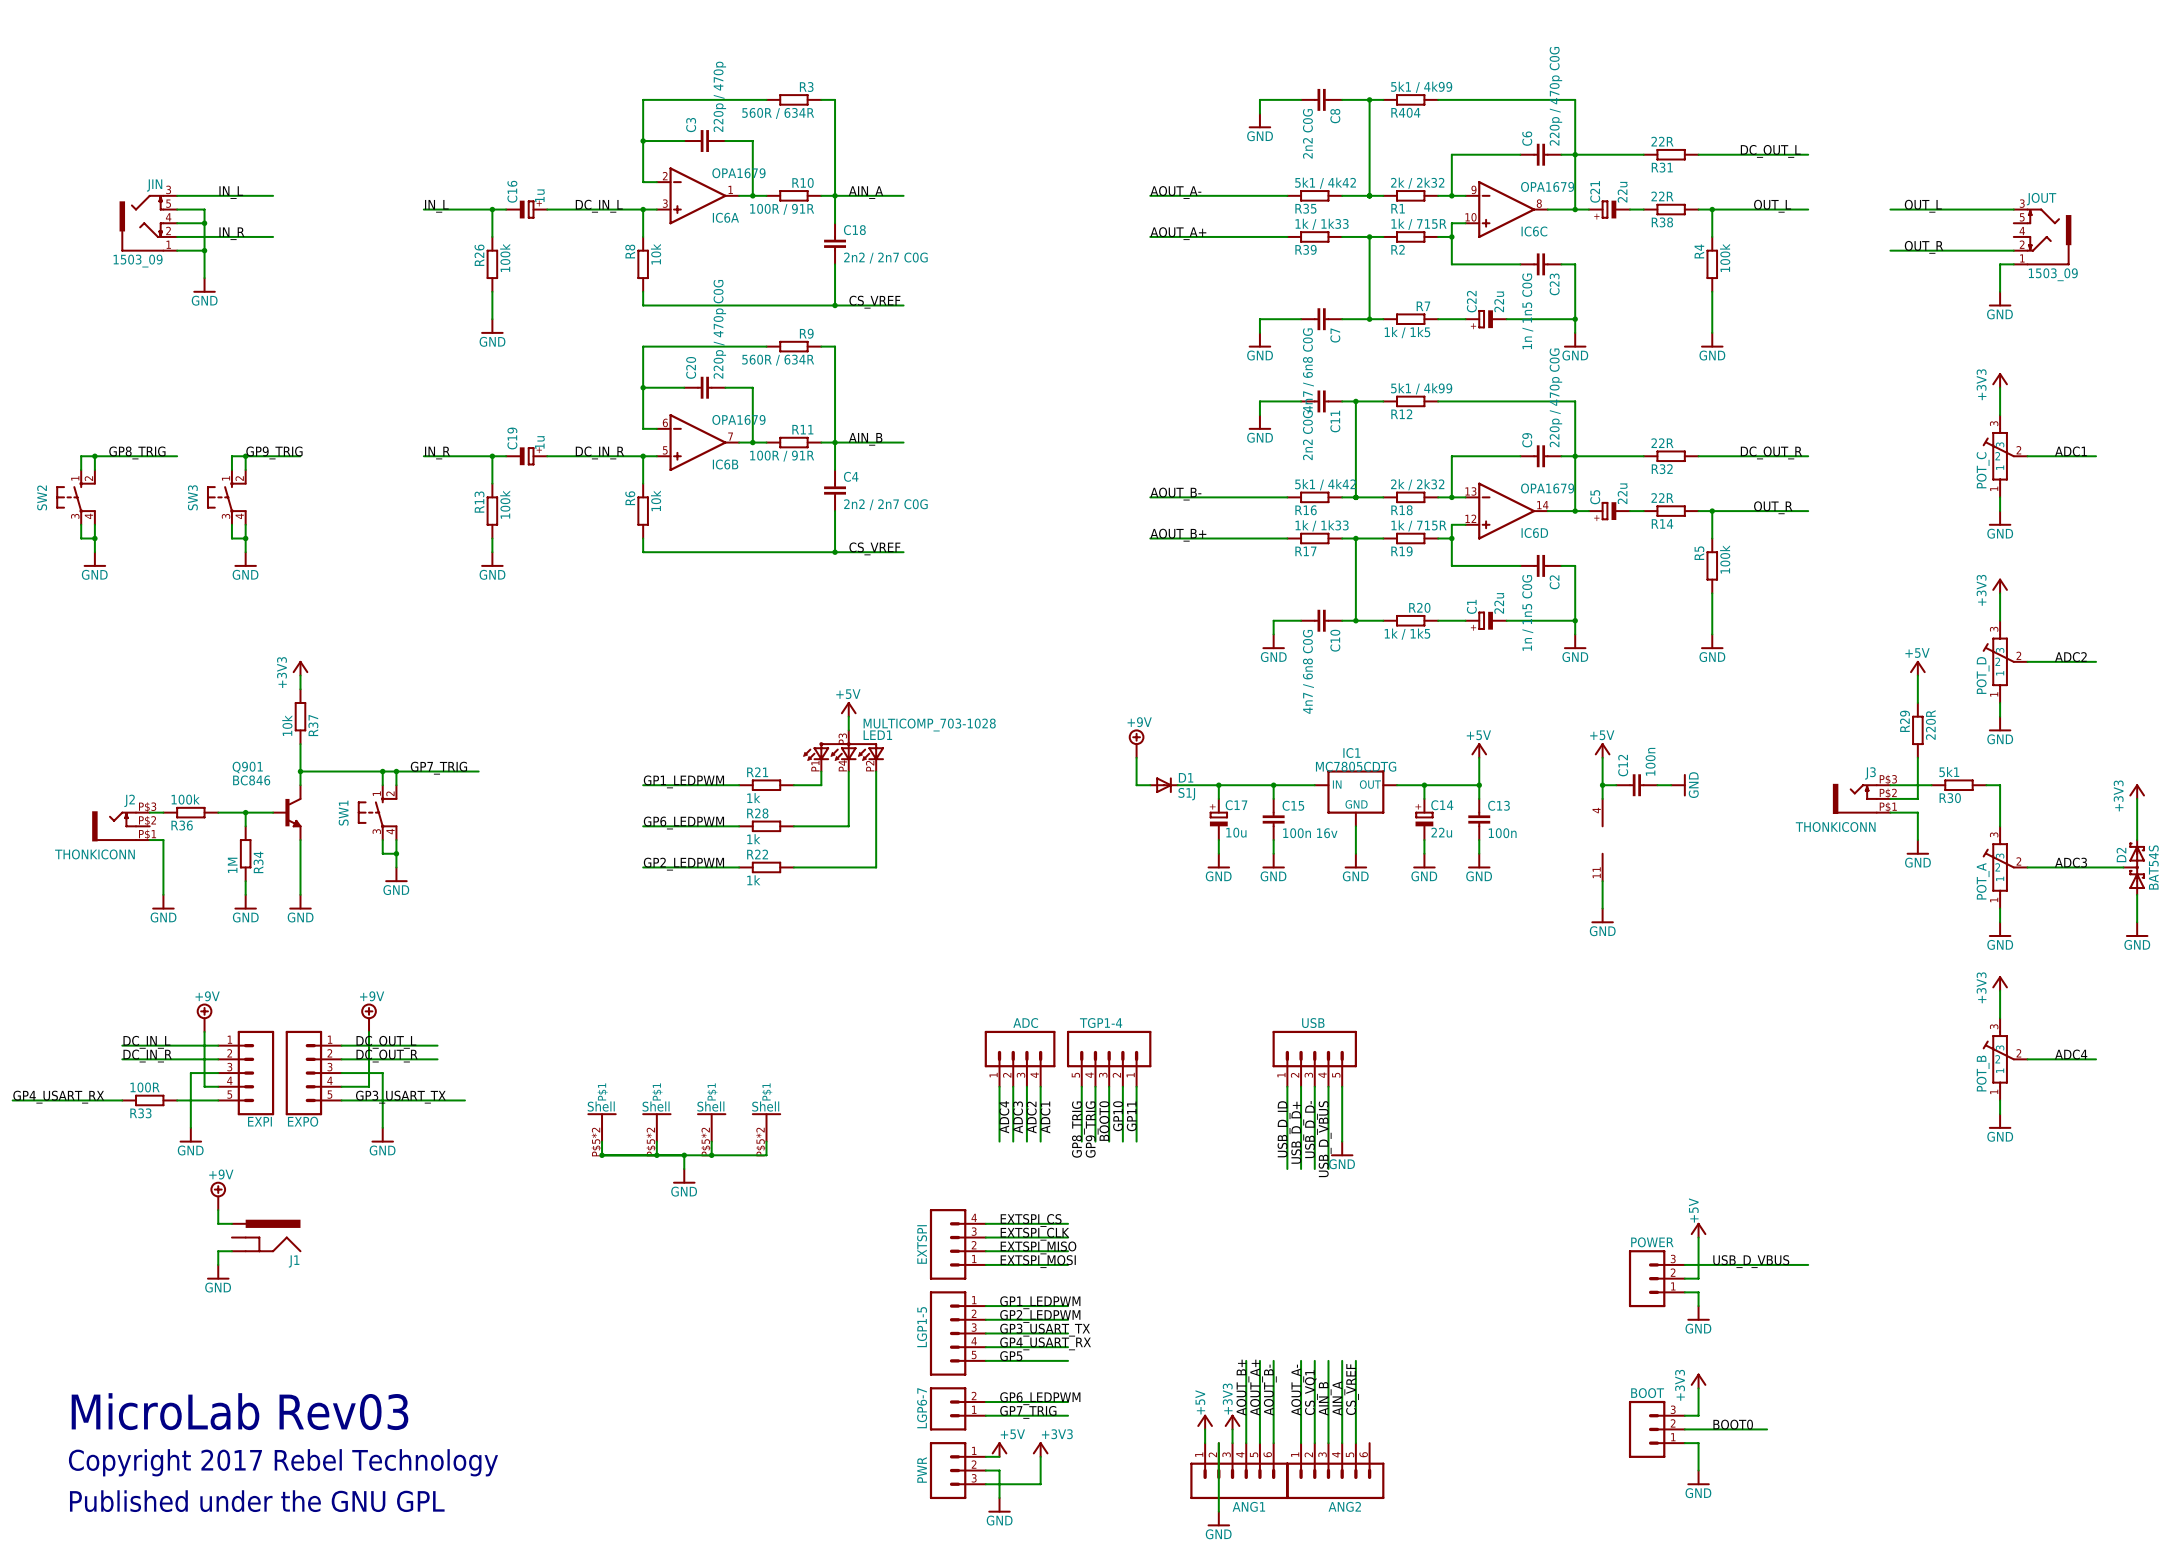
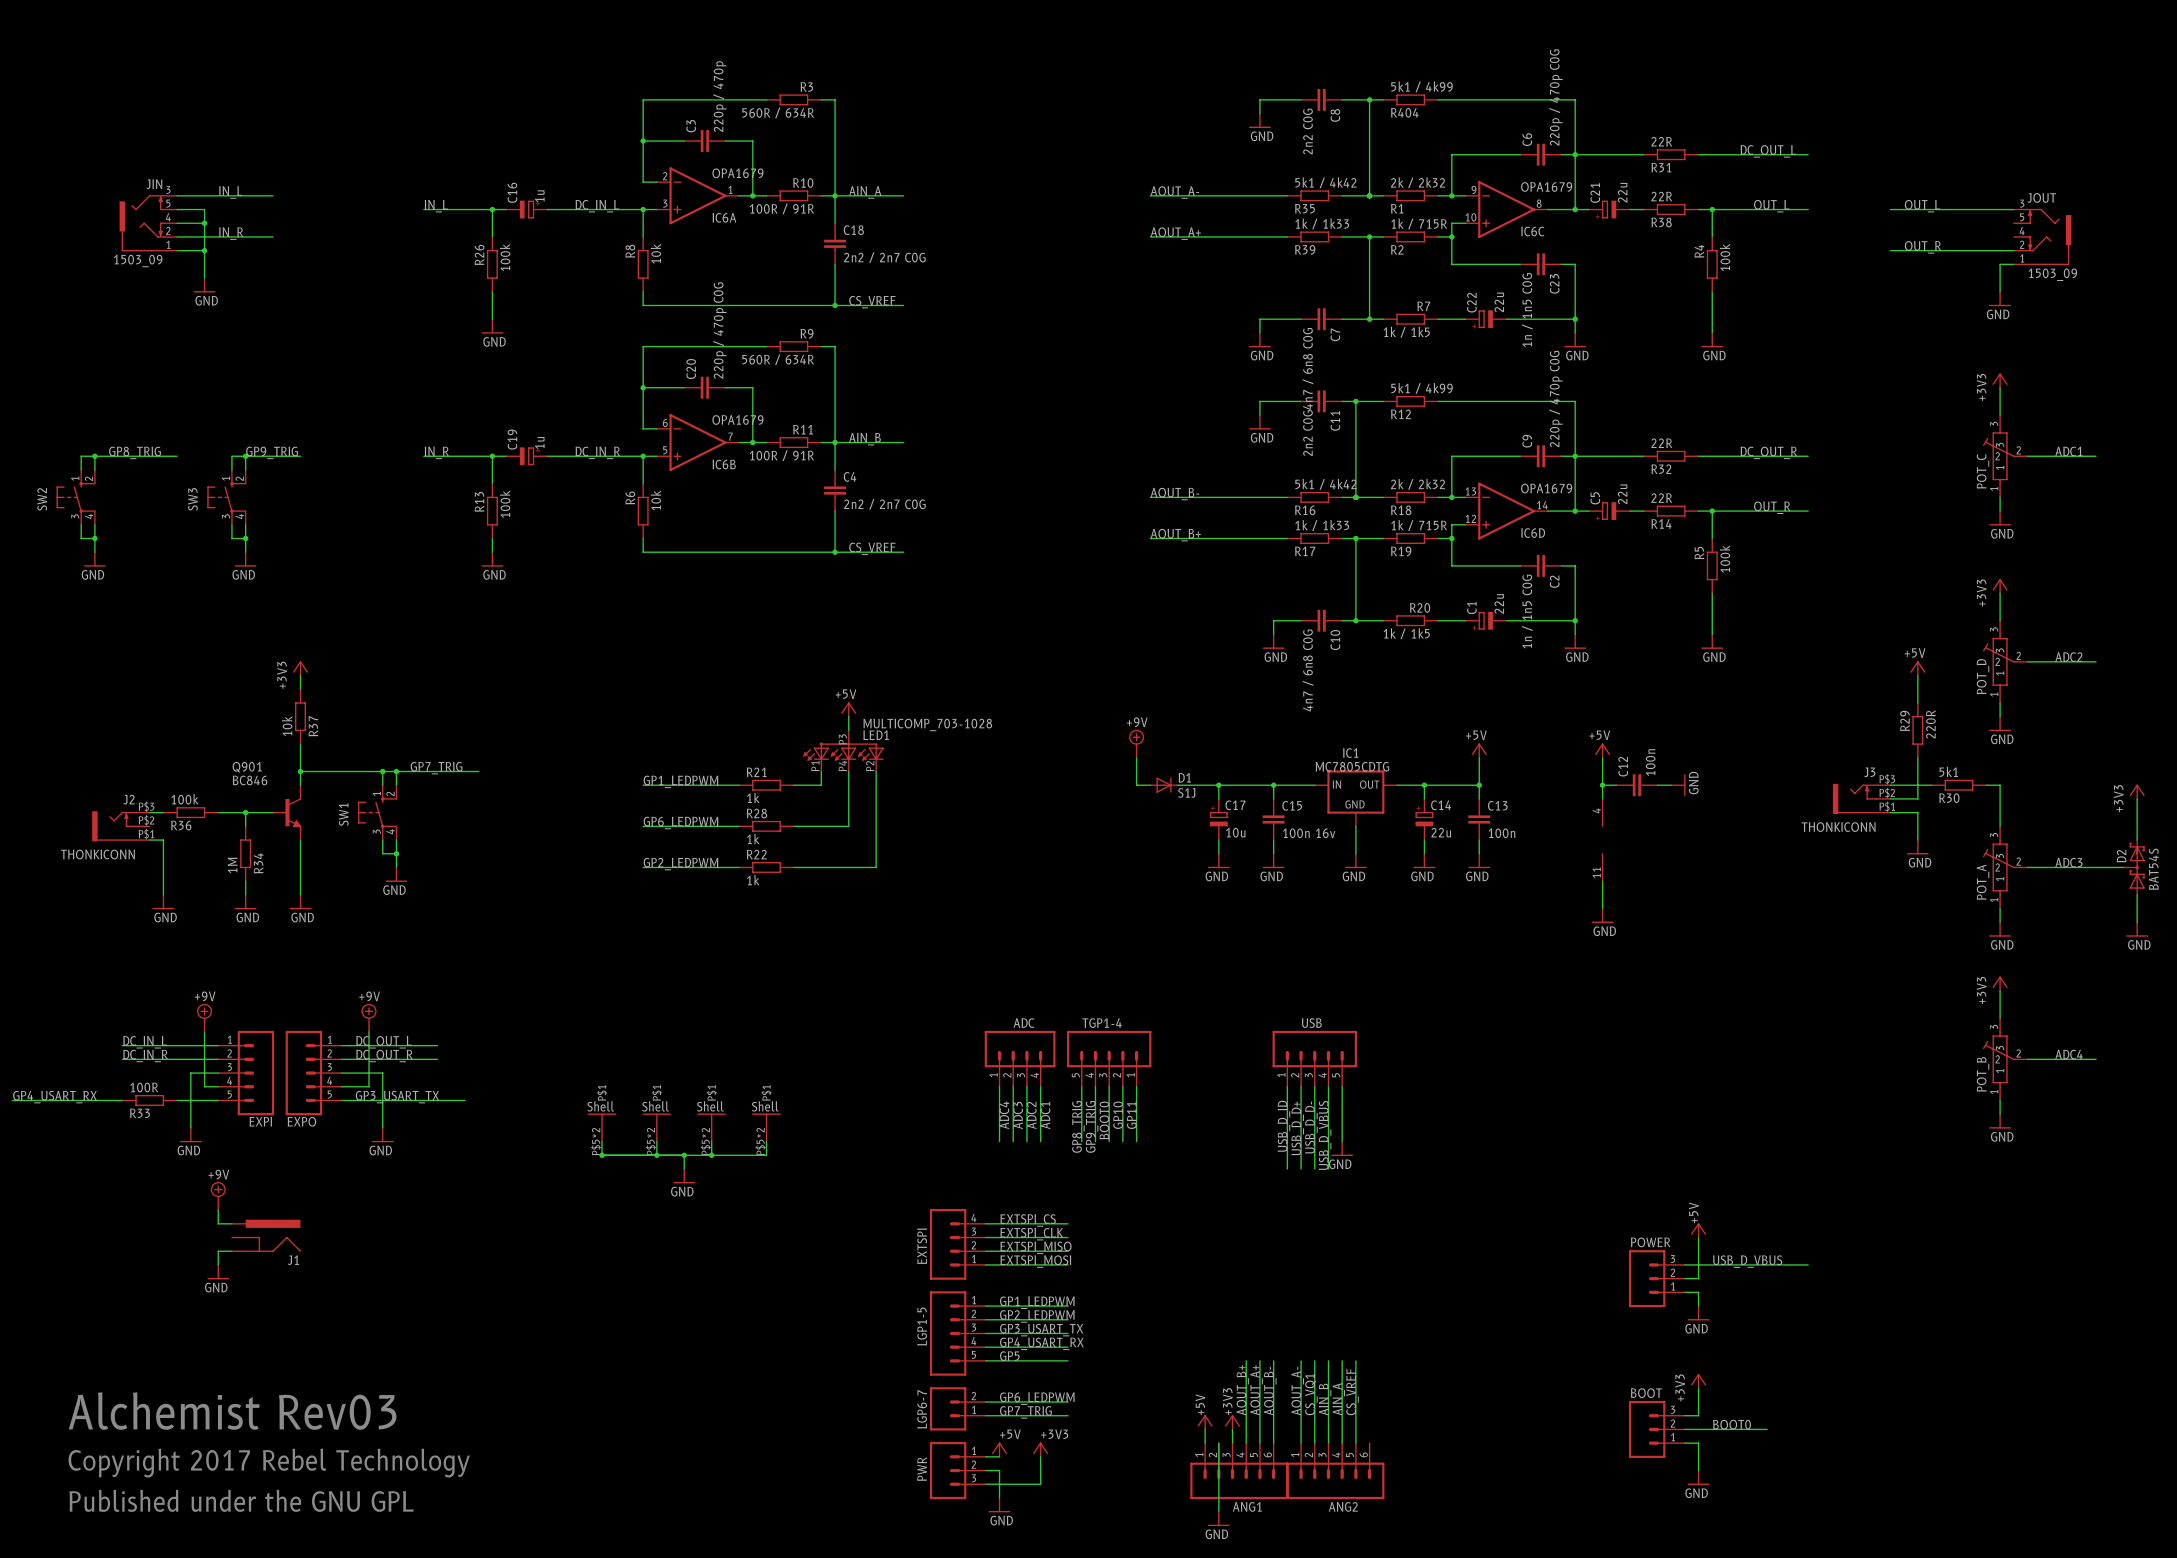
text: MicroLab Rev03 (239, 1411) -> Alchemist Rev03 (232, 1411)

